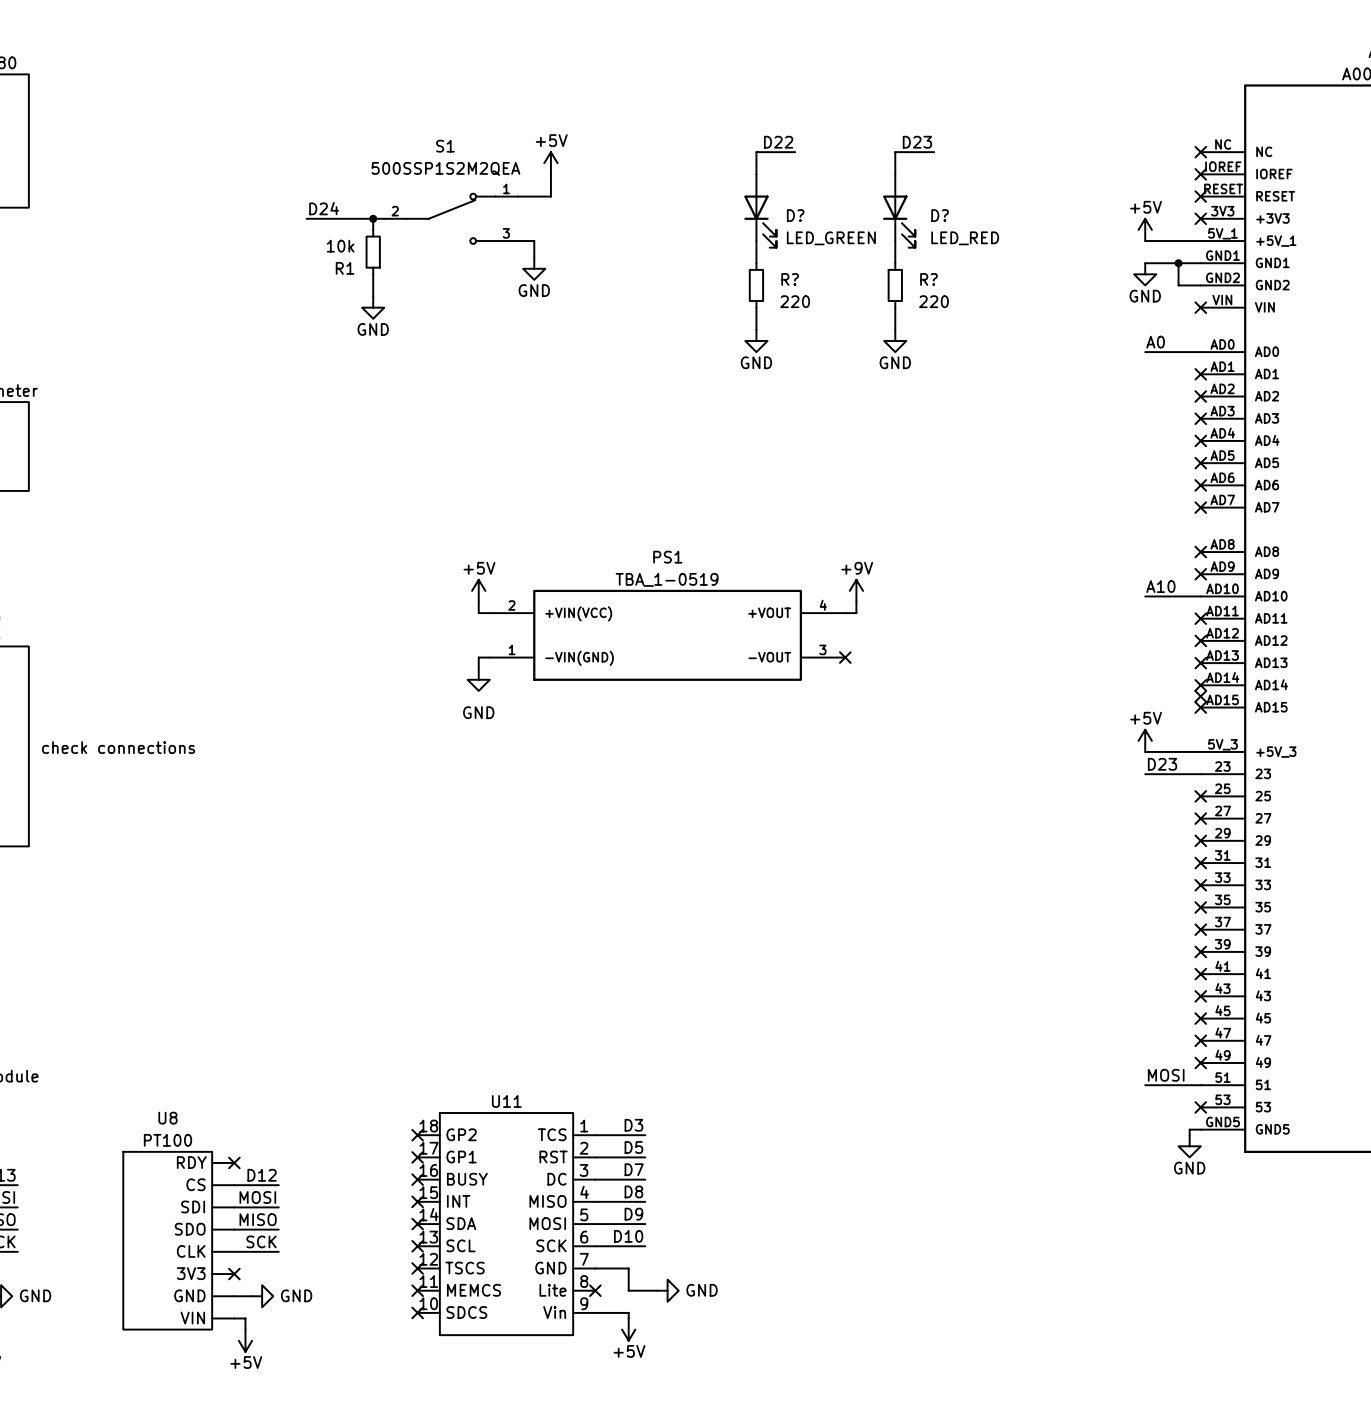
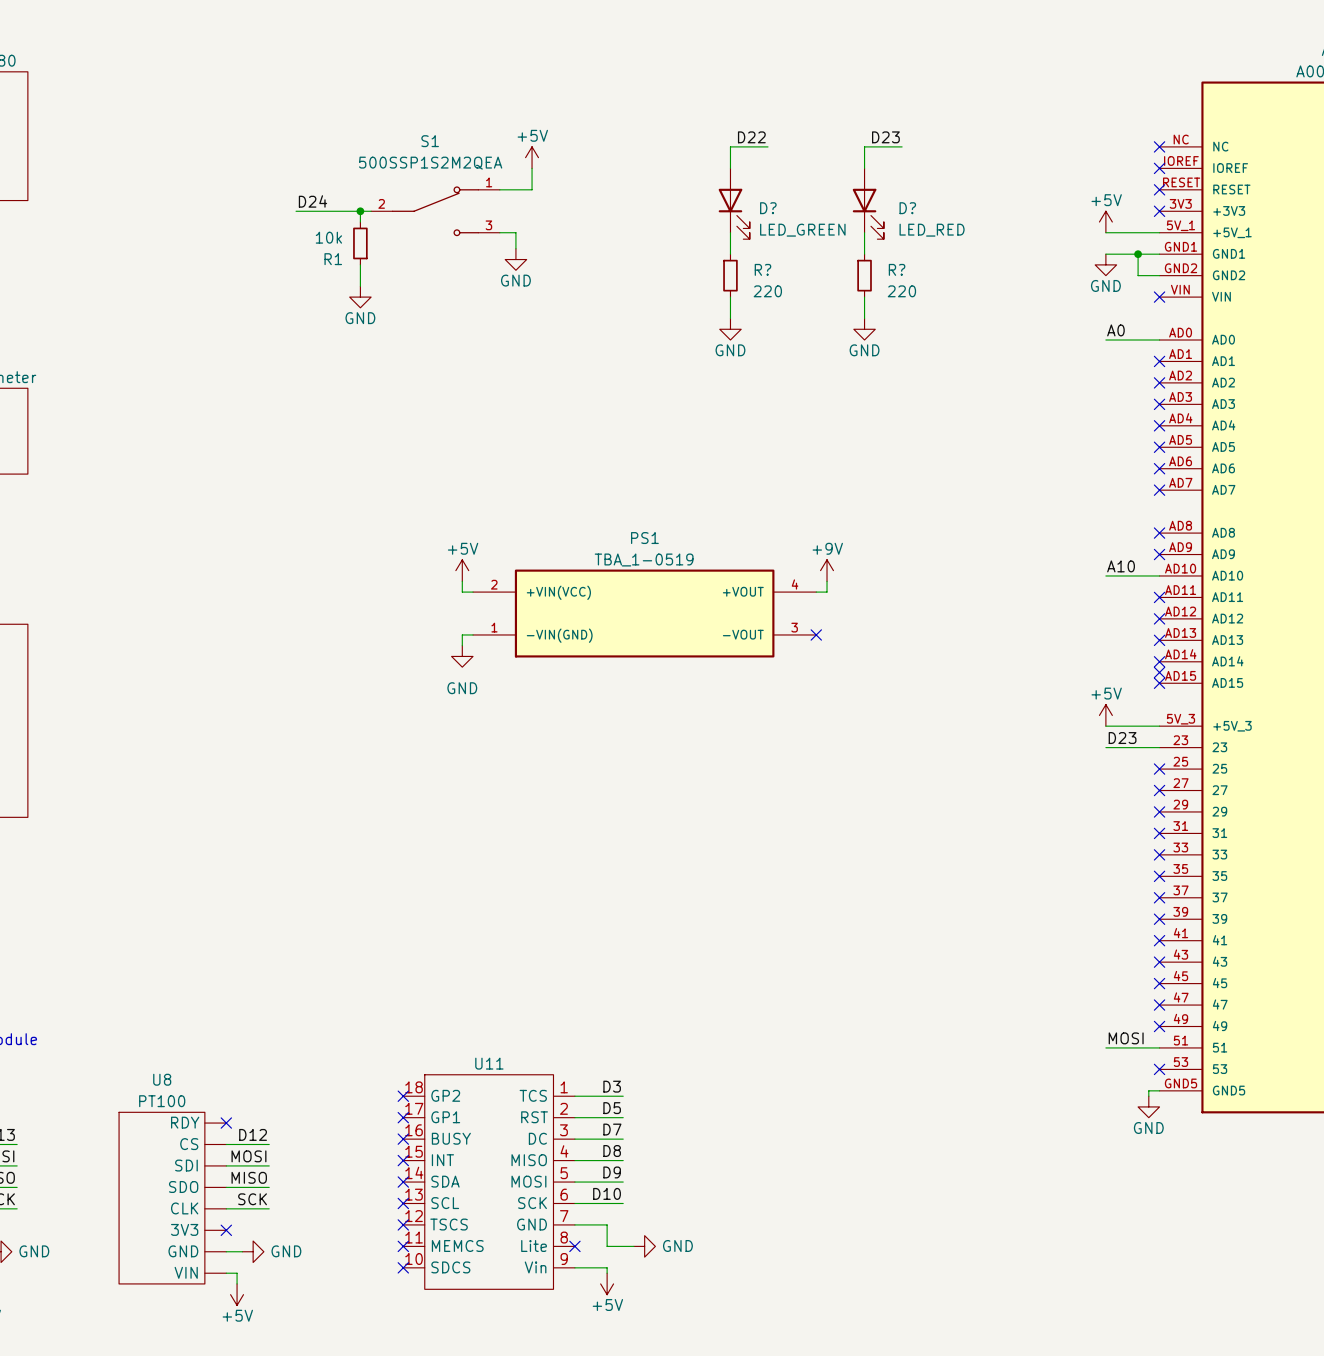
label: check connections (118, 747) -> none

